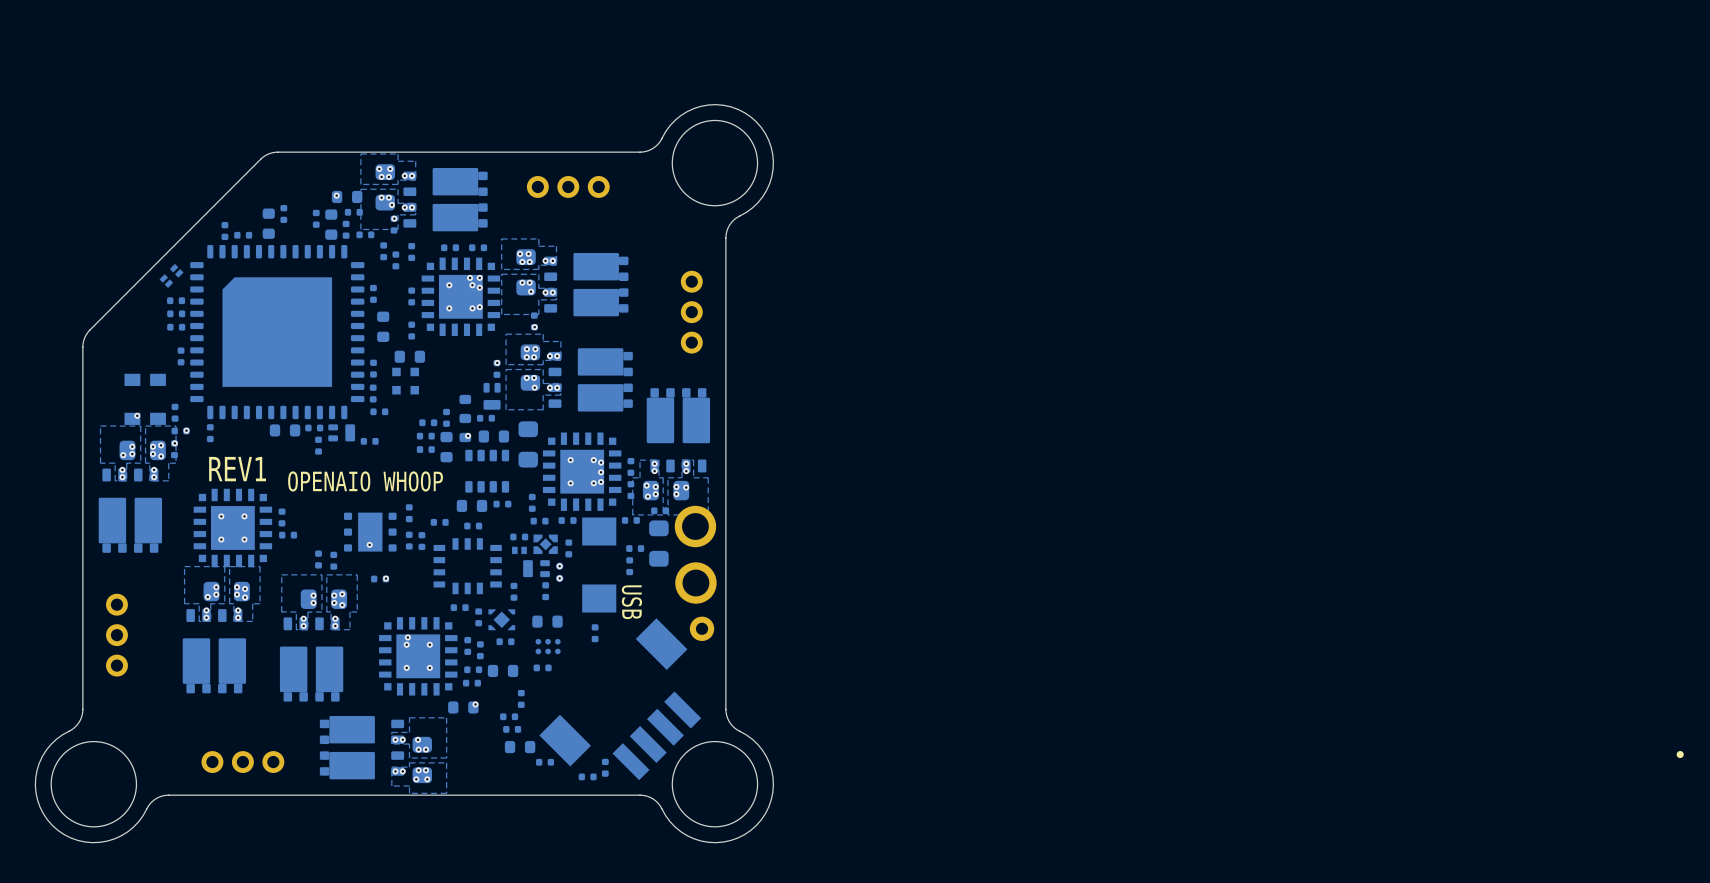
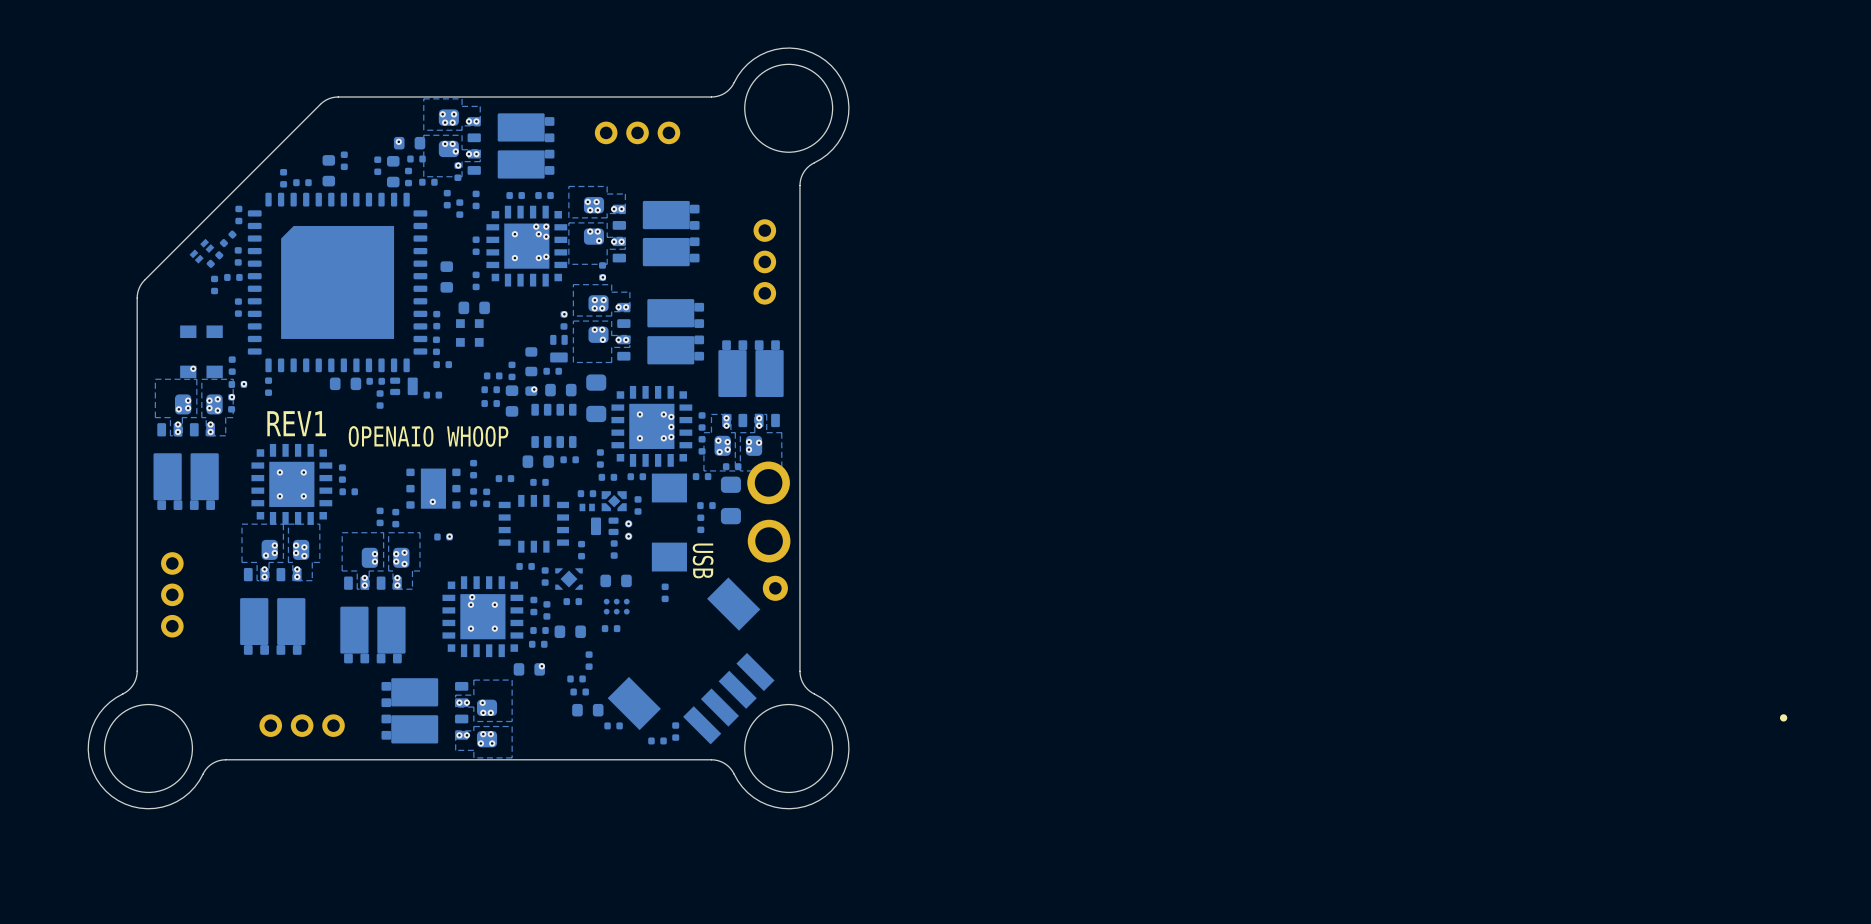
part: none -> (238, 214)
part position: (171, 275) -> (201, 251)
part: none -> (228, 238)
part: (373, 293) -> none
part: (176, 300) -> none
part: none -> (238, 256)
part: none -> (215, 259)
part: (176, 313) -> none
part: none -> (214, 284)

